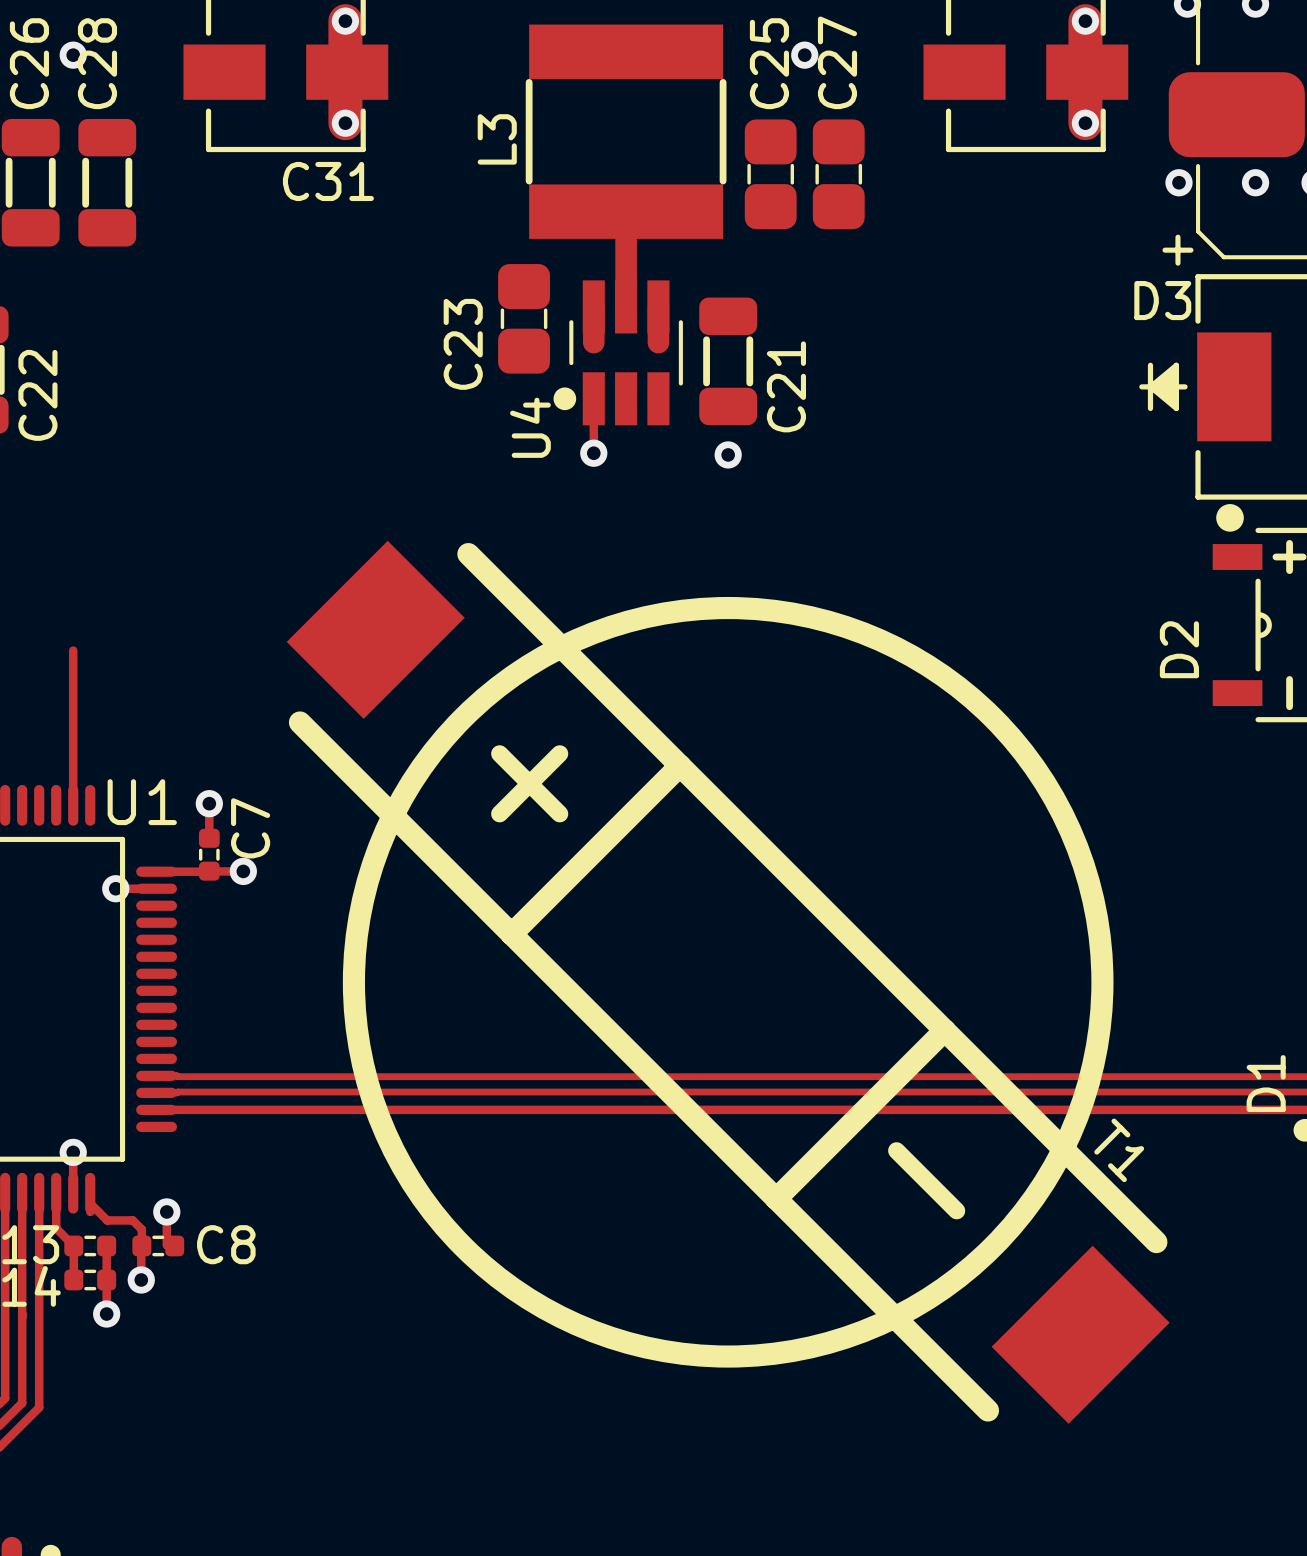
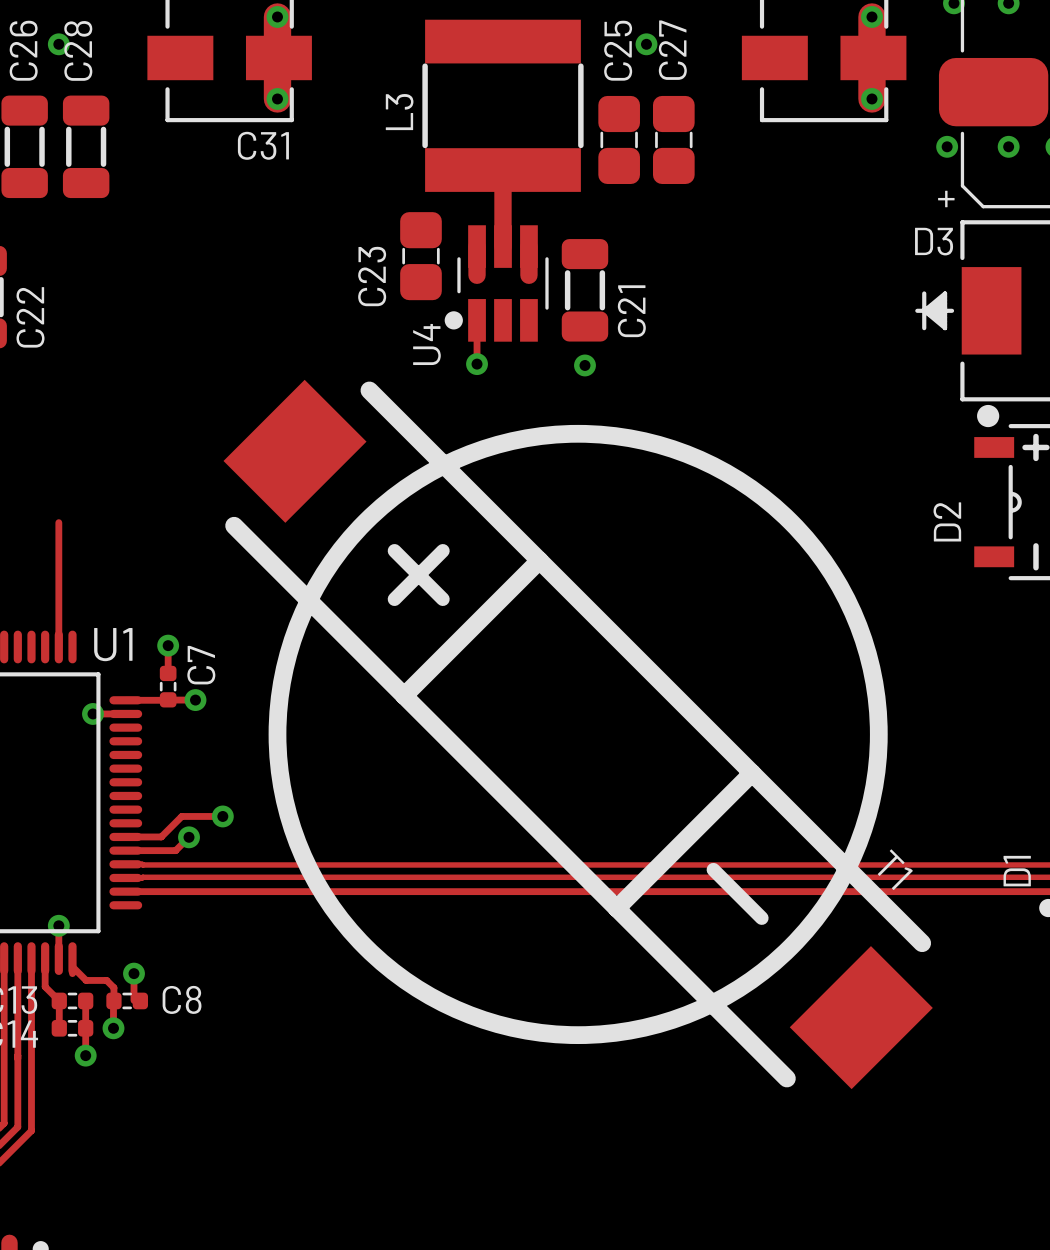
T1 position: (728, 982) -> (578, 734)
track: none -> (222, 816) (181, 816) (161, 836) (125, 836)
via: none -> (222, 816)
track: none -> (189, 837) (175, 850) (125, 850)
via: none -> (189, 837)

